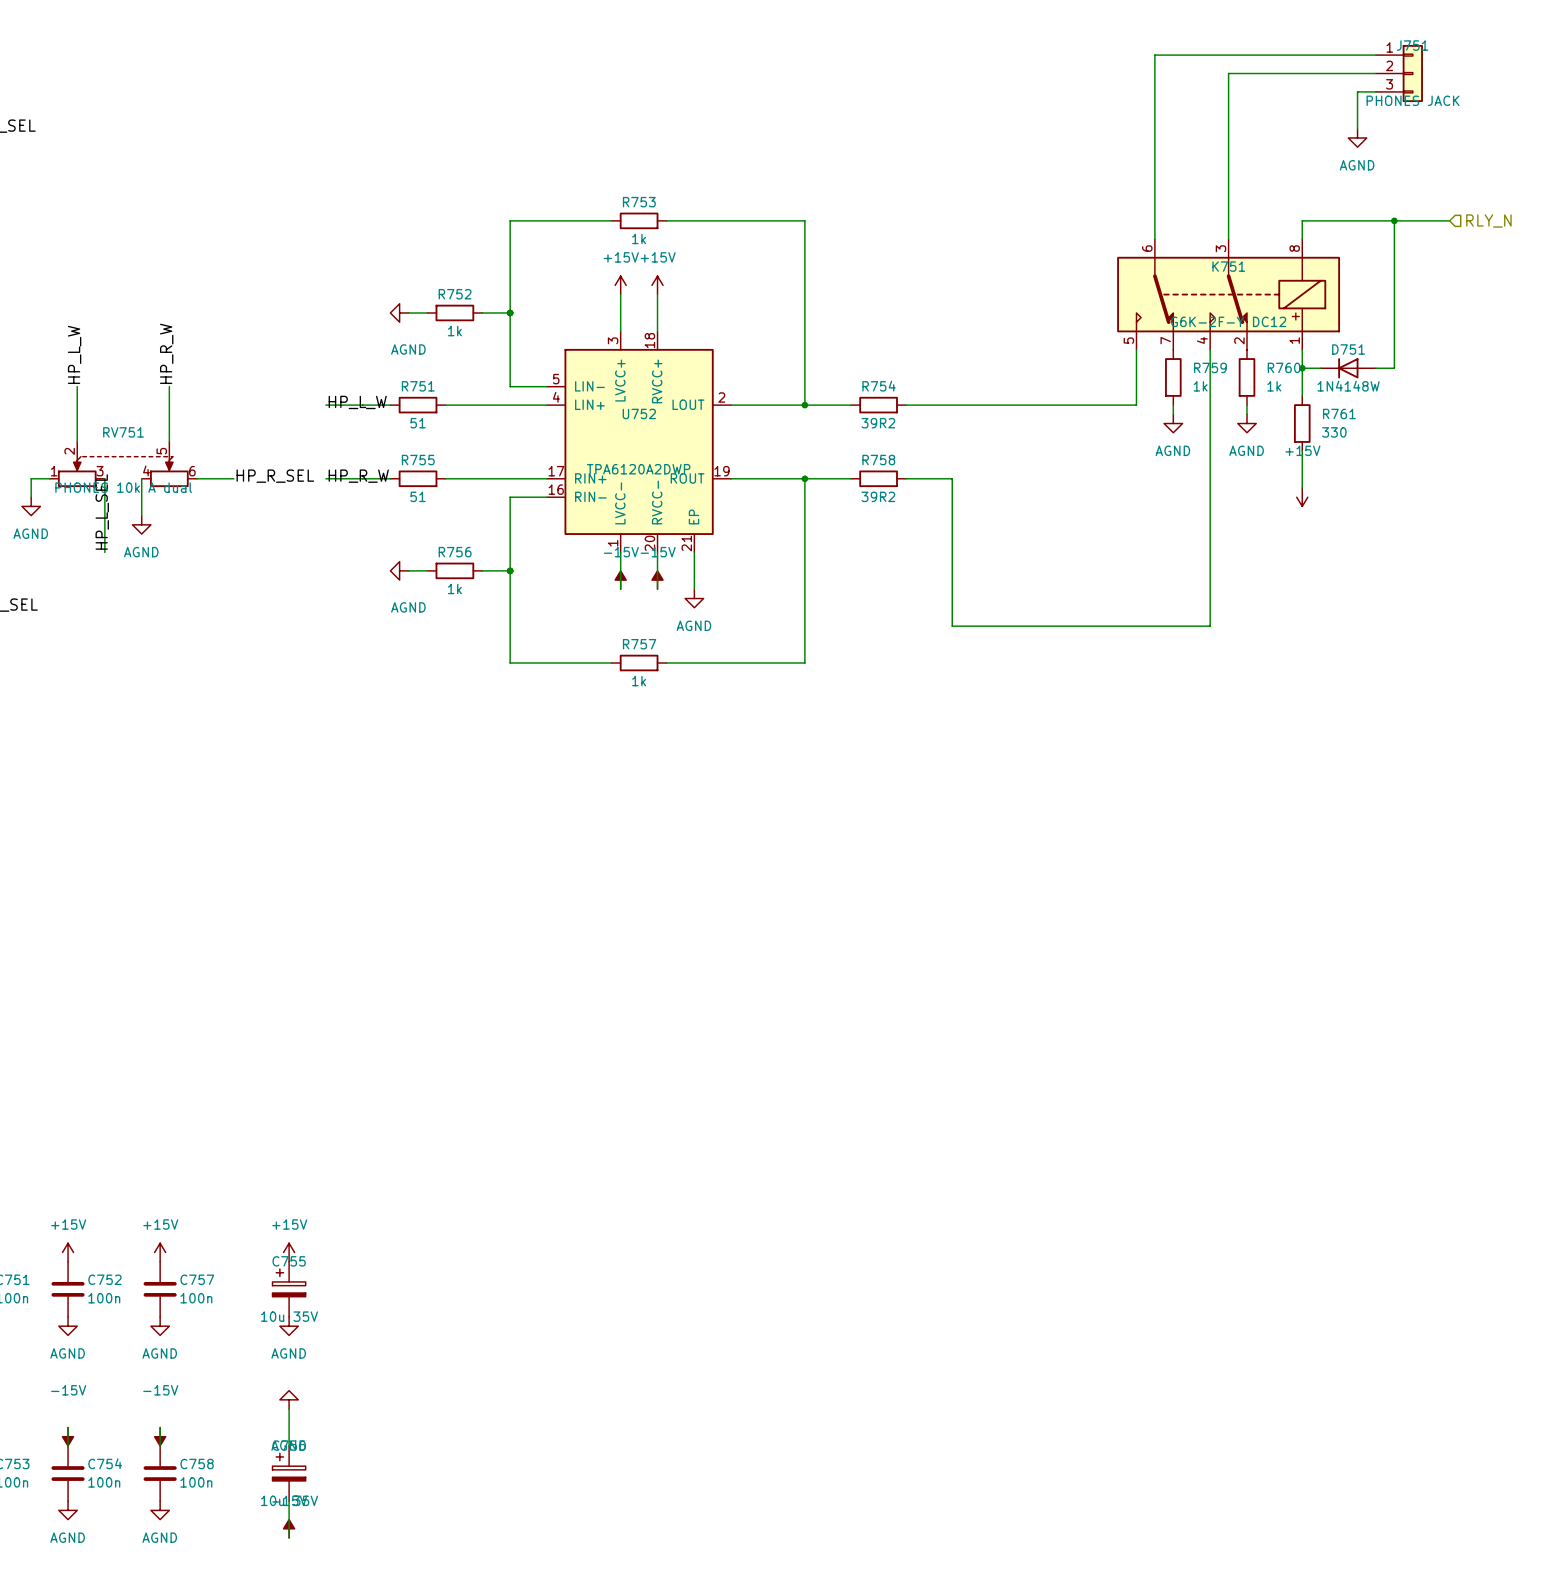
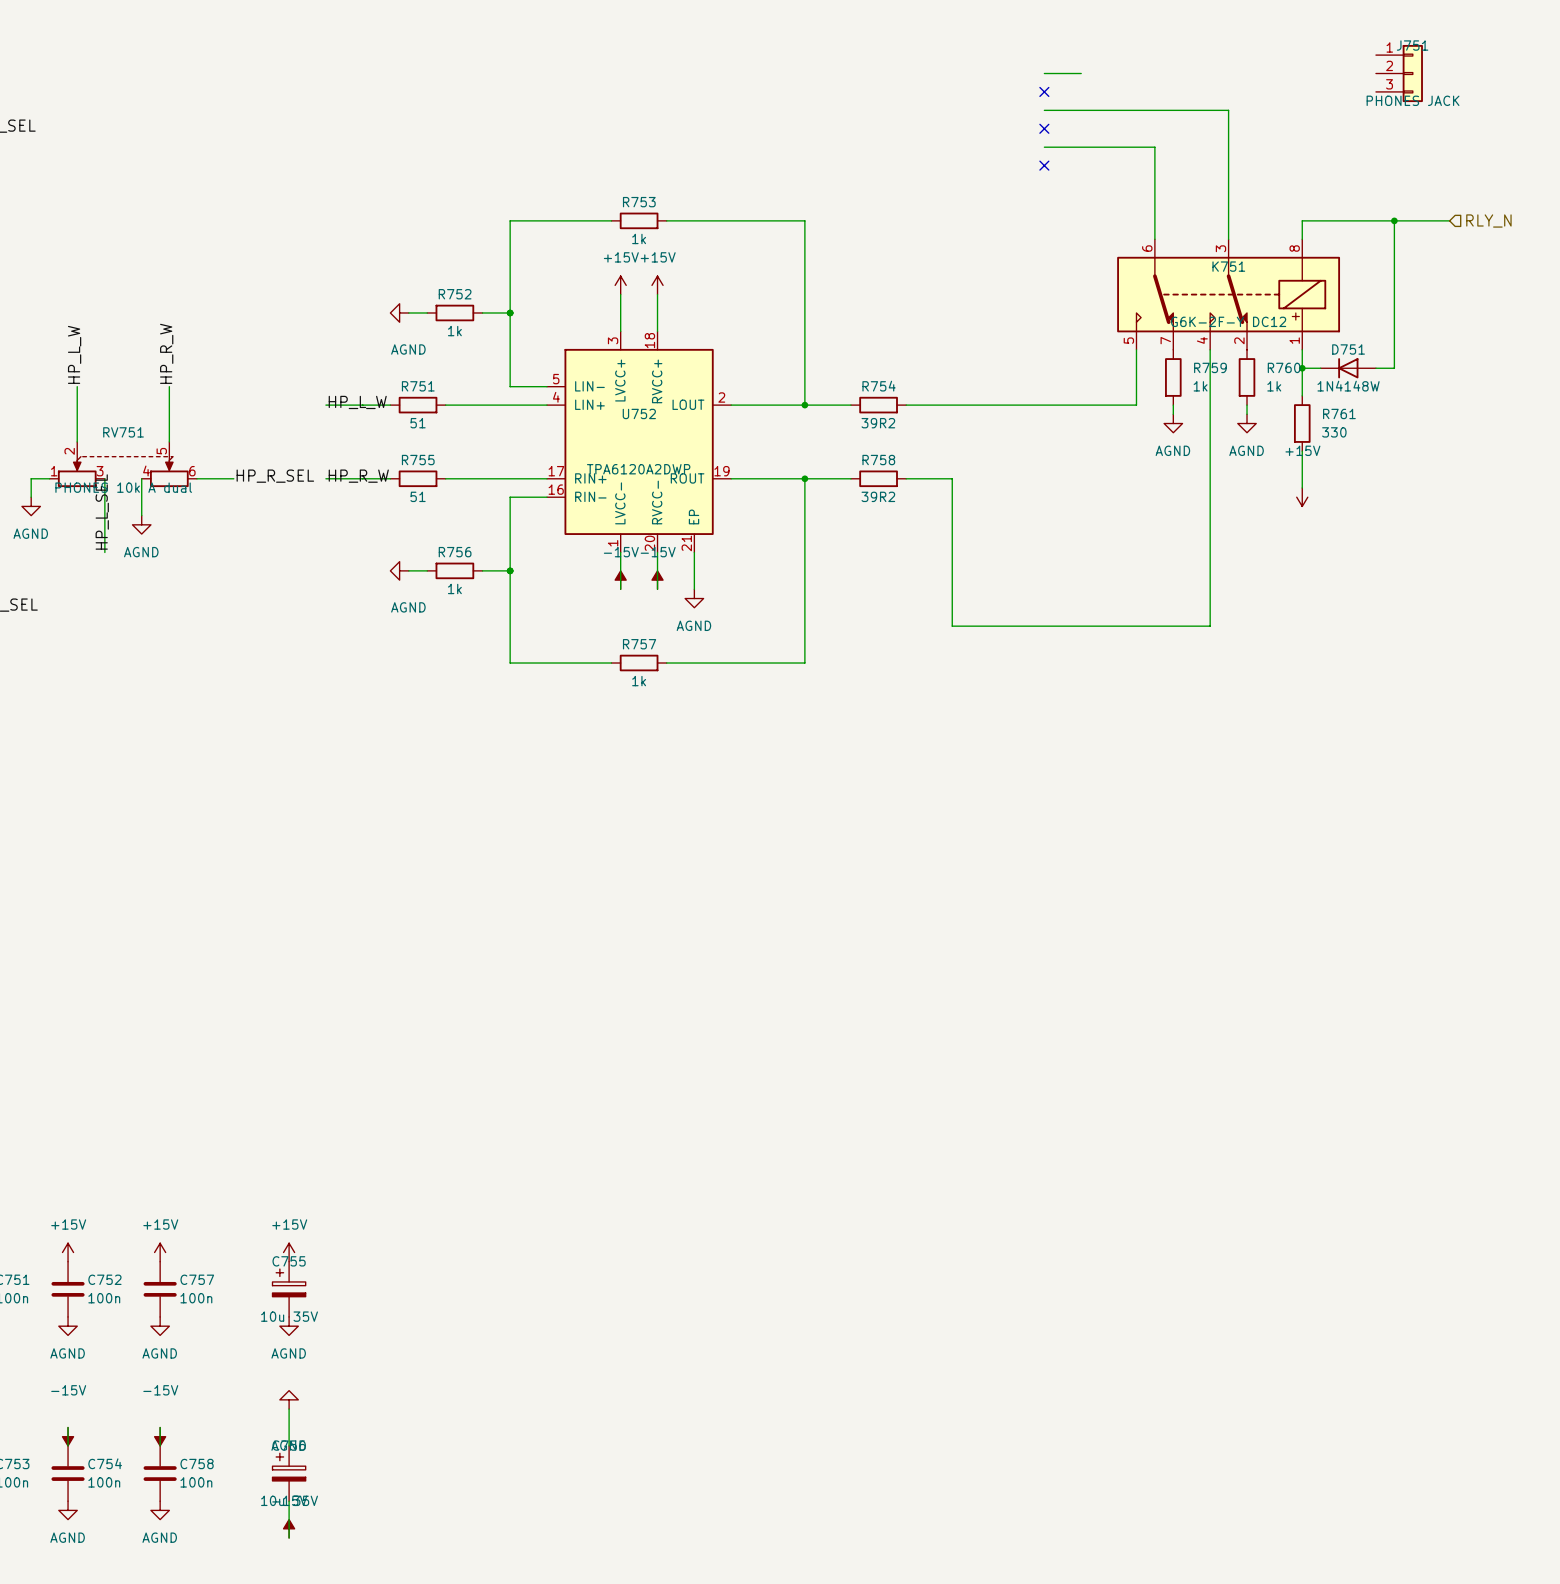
wire: (1375, 55) (1154, 55) (1154, 147) -> (1044, 147) (1154, 147)
wire: none -> (1044, 73) (1081, 73)
wire: (1375, 73) (1228, 73) (1228, 110) -> (1044, 110) (1228, 110)
no-connect mark: none -> (1044, 91)
wire: (1375, 91) (1357, 91) (1357, 128) -> none
no-connect mark: none -> (1044, 128)
power symbol: AGND (1357, 137) -> none
no-connect mark: none -> (1044, 165)

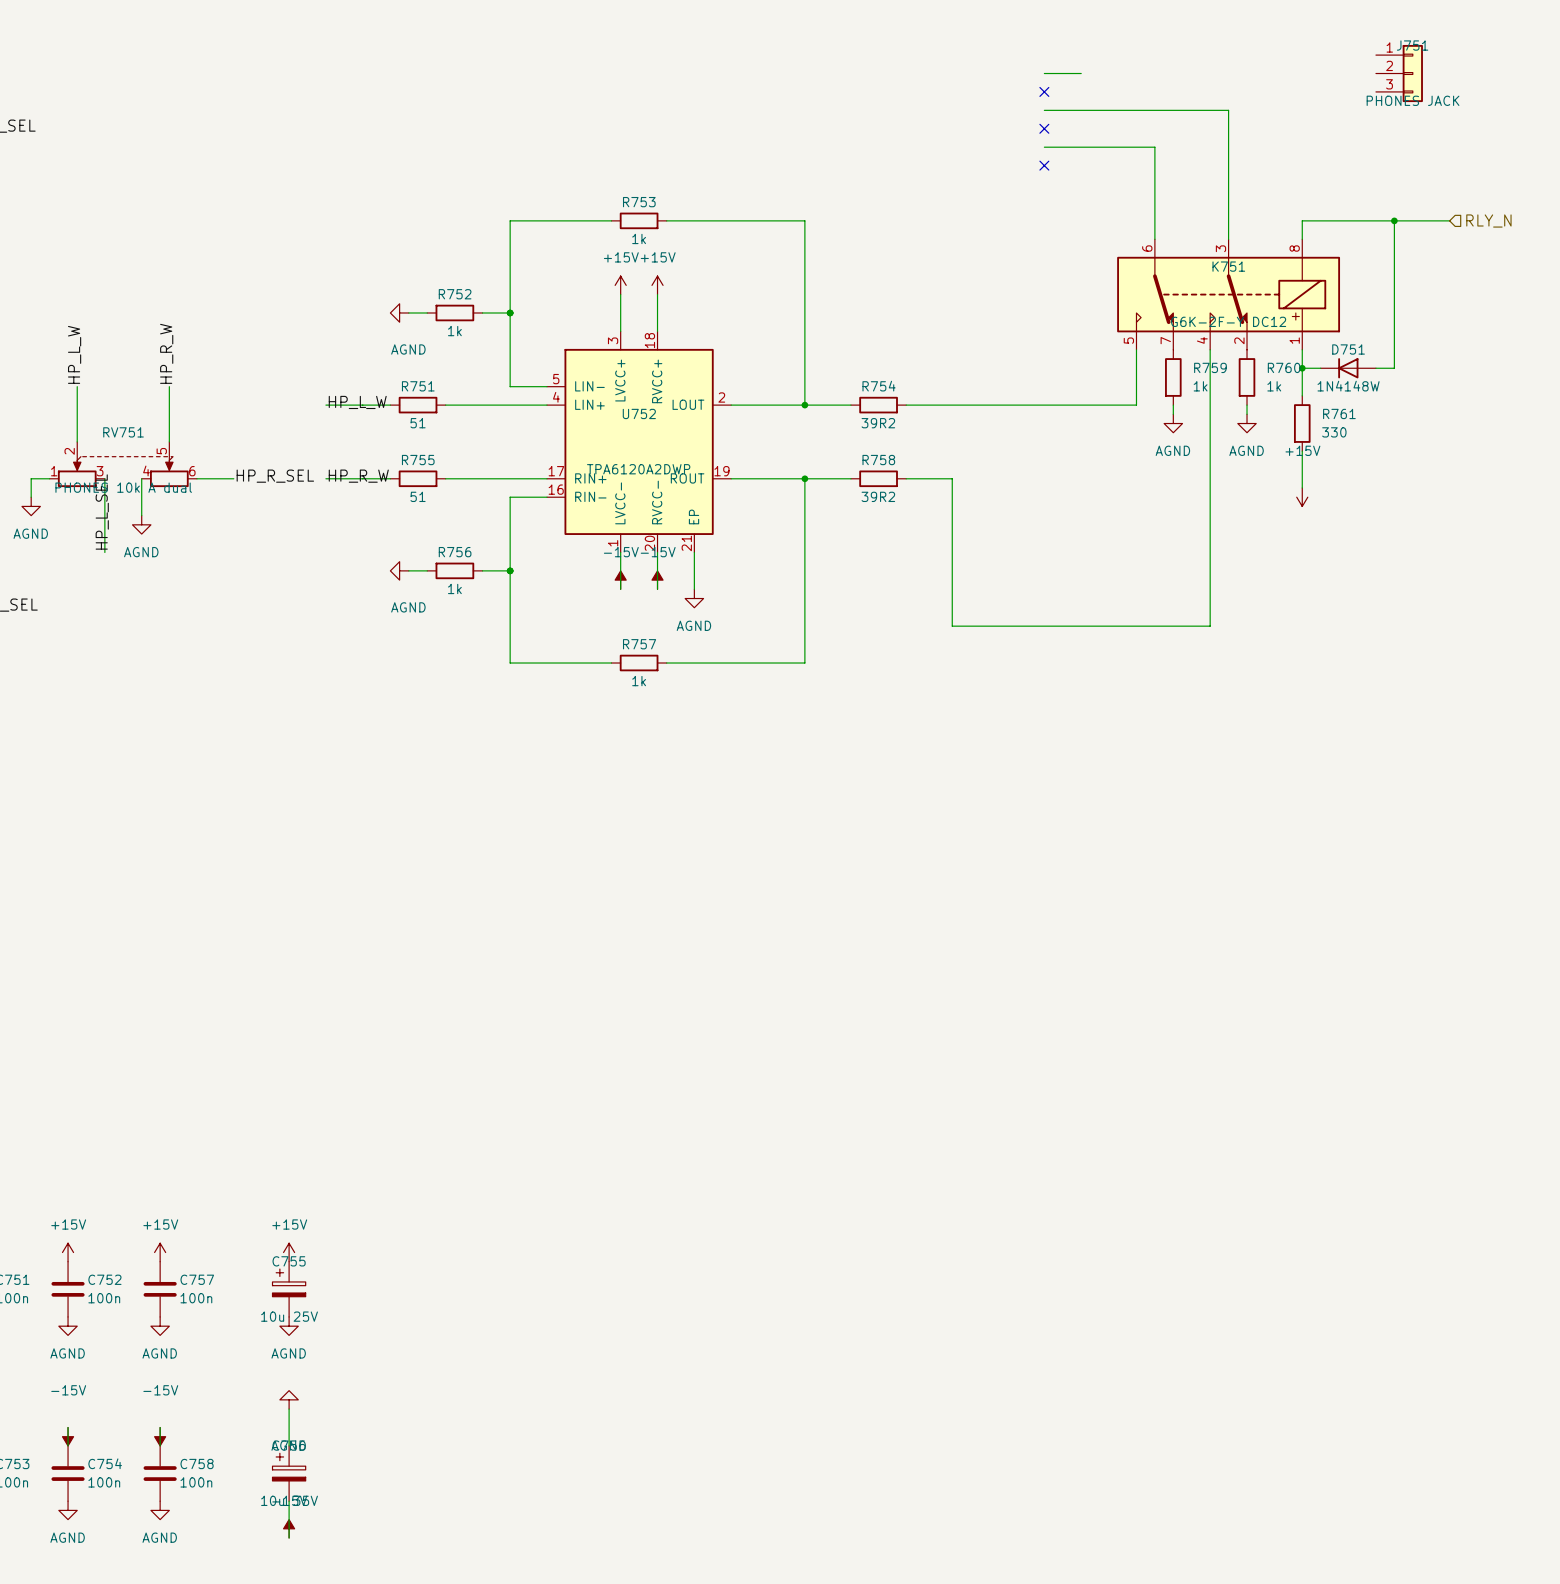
C755 value: 10u 35V (289, 1316) -> 10u 25V (289, 1316)

